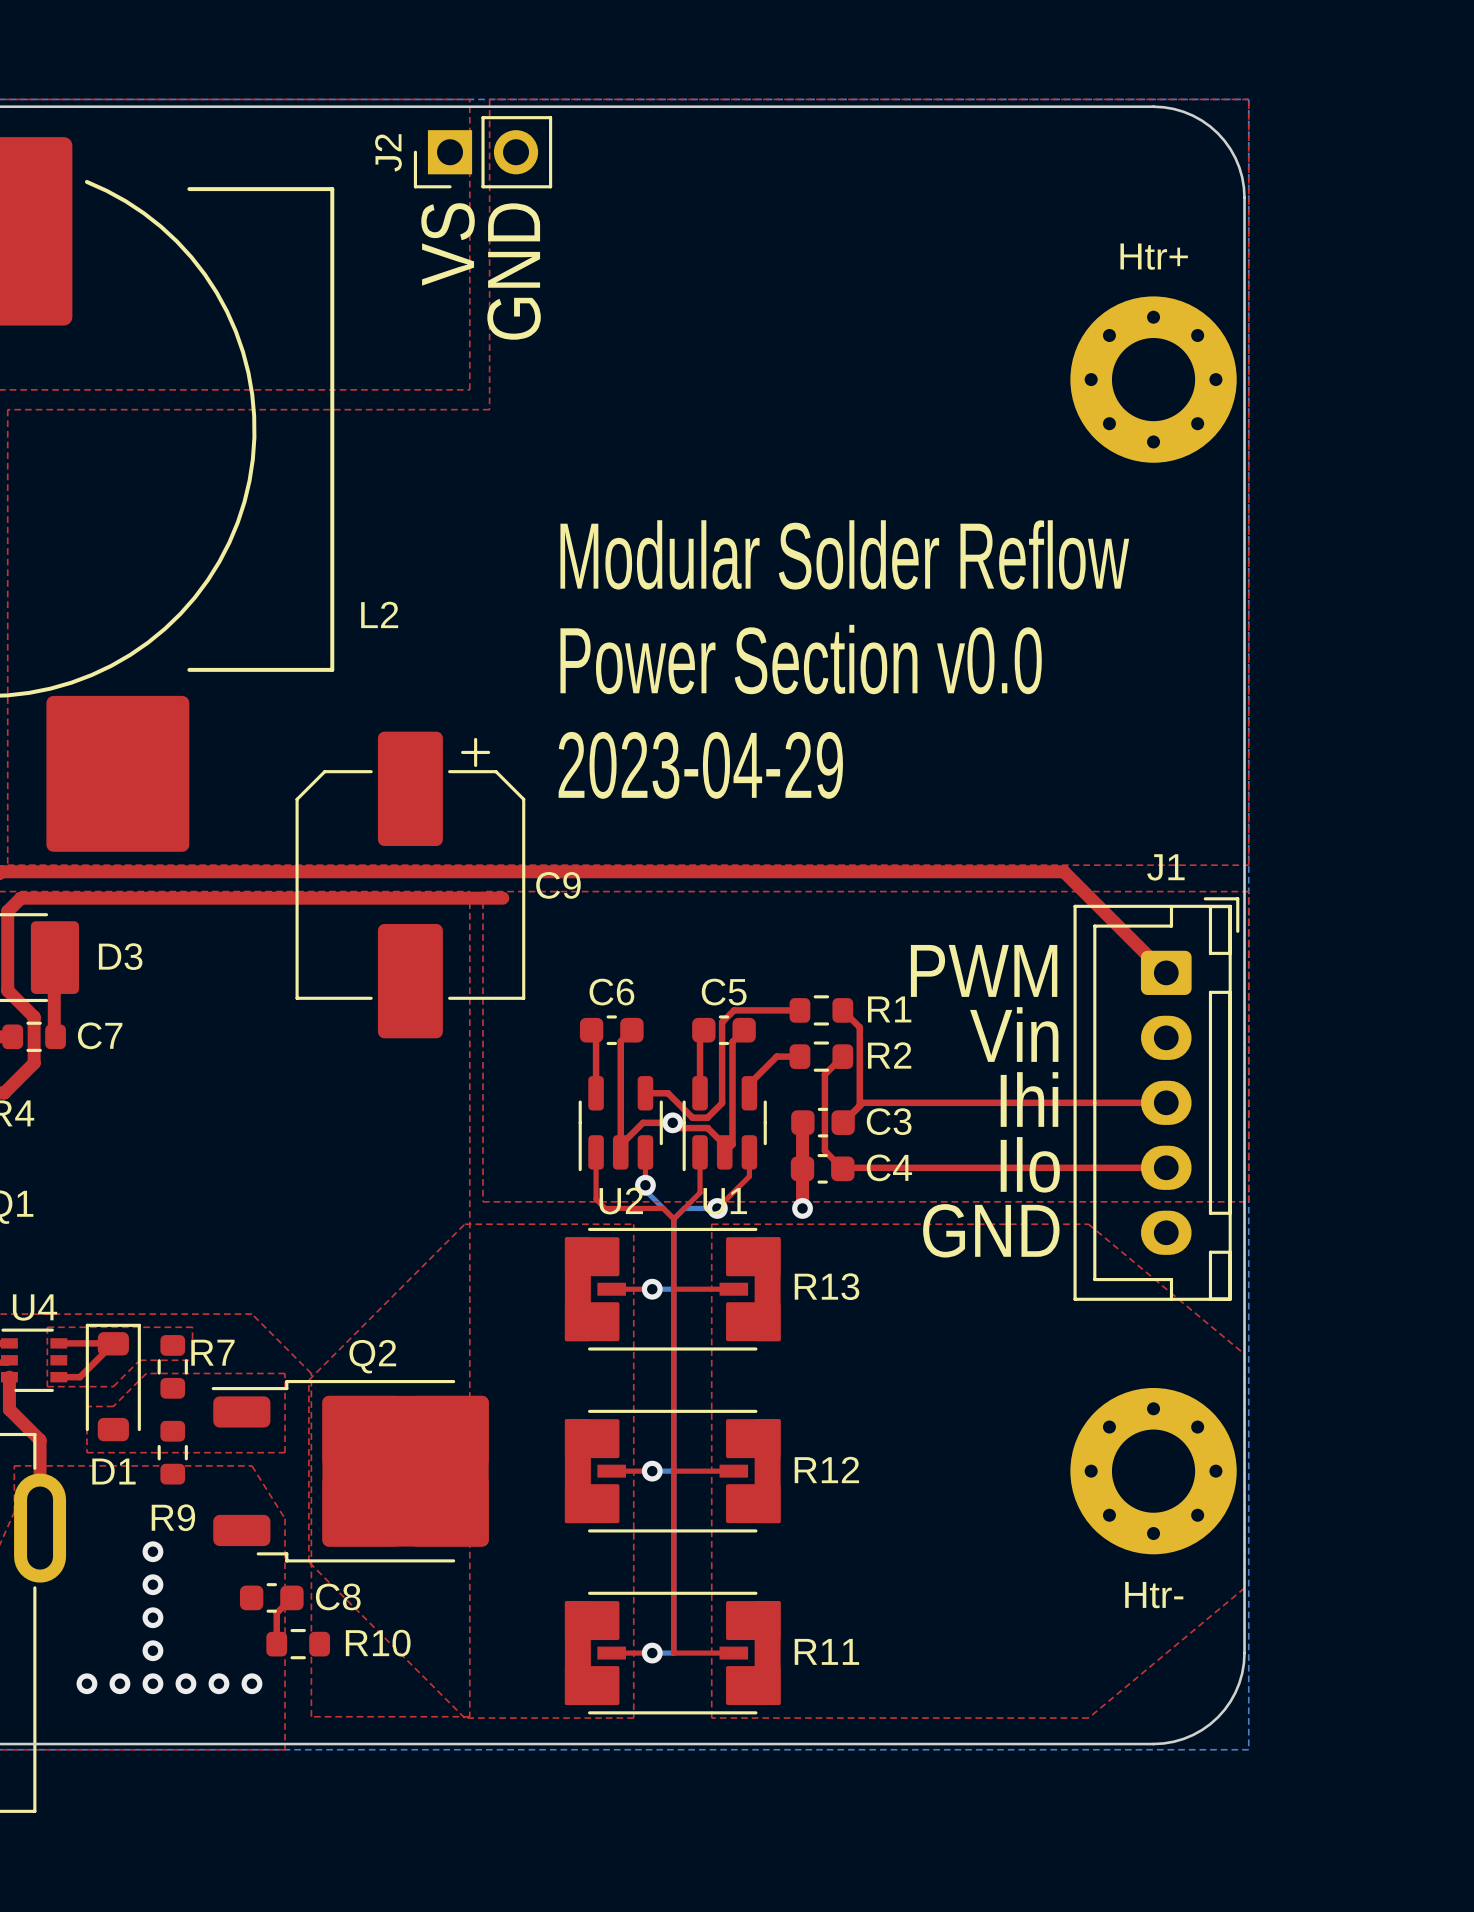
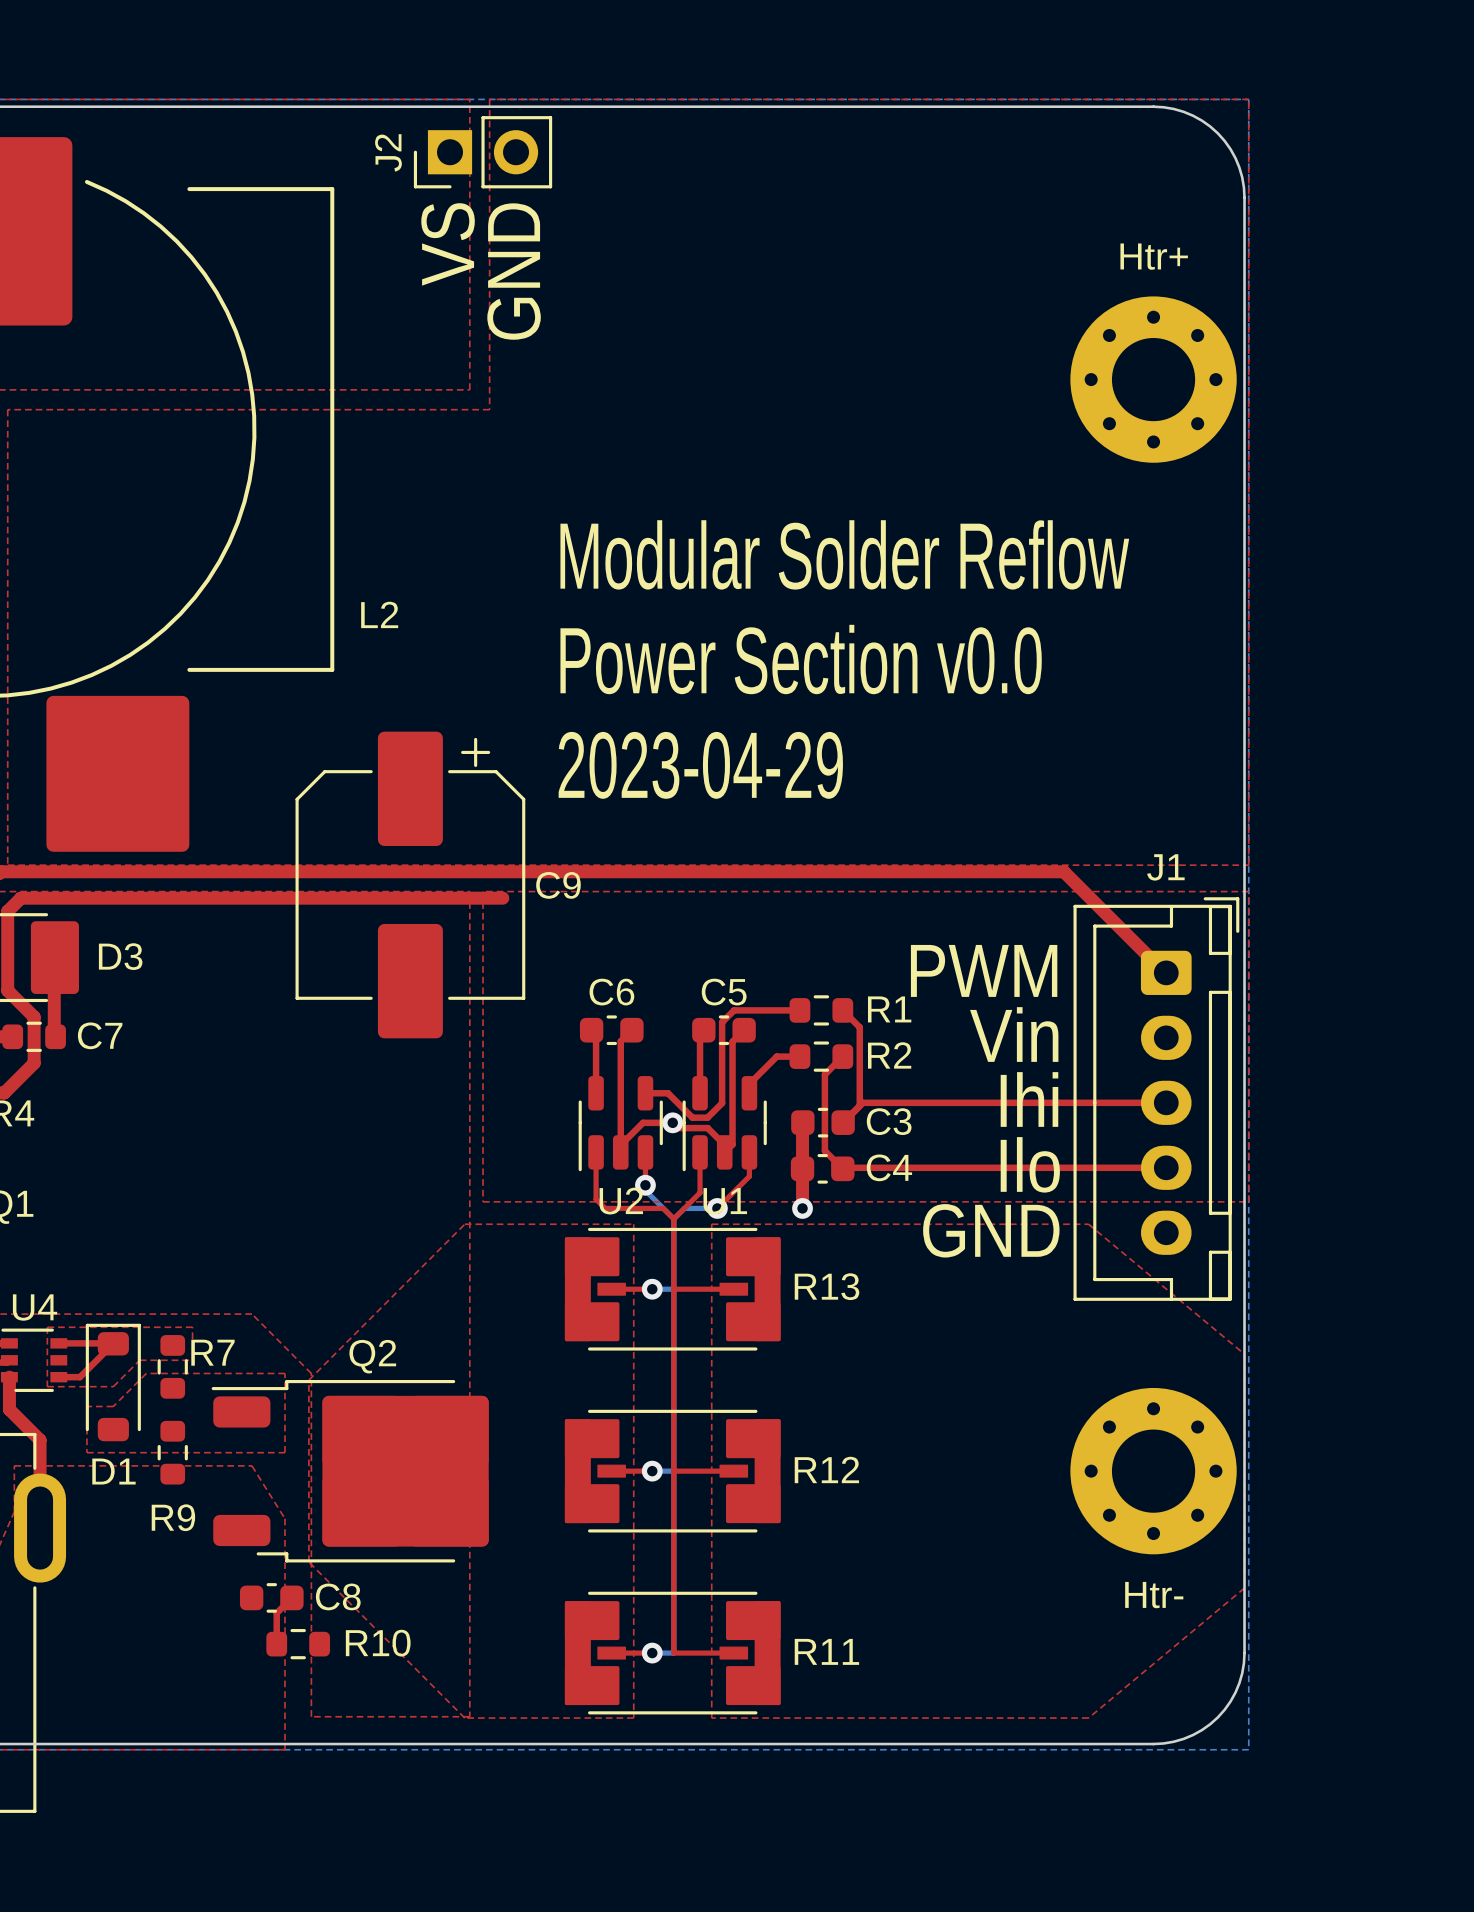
via: (152, 1551) -> none
via: (152, 1584) -> none
via: (152, 1617) -> none
via: (152, 1650) -> none
via: (86, 1683) -> none
via: (119, 1683) -> none
via: (152, 1683) -> none
via: (185, 1683) -> none
via: (218, 1683) -> none
via: (251, 1683) -> none

